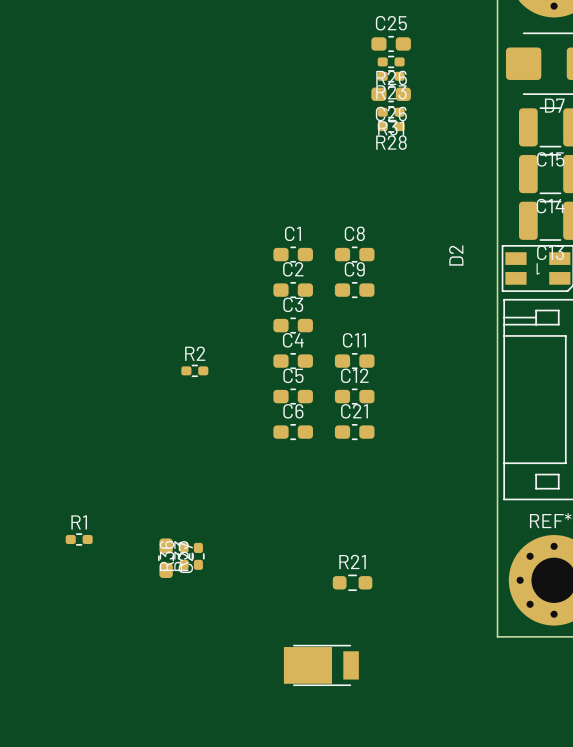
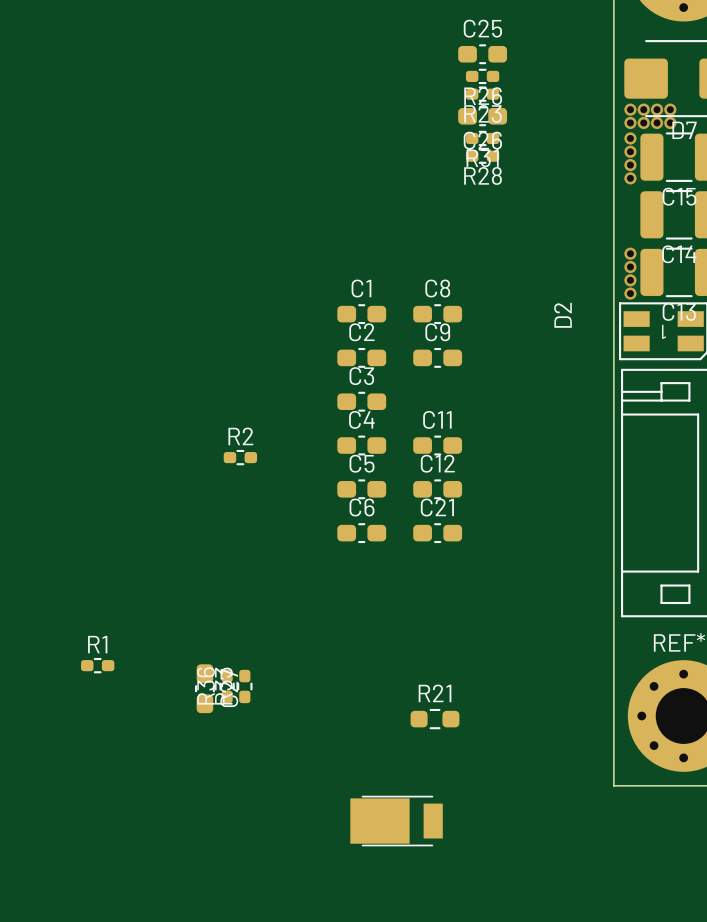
via: none -> (630, 109)
via: none -> (643, 109)
via: none -> (657, 109)
via: none -> (670, 109)
via: none -> (630, 122)
via: none -> (643, 122)
via: none -> (657, 122)
via: none -> (670, 122)
via: none -> (630, 138)
via: none -> (630, 151)
via: none -> (630, 165)
via: none -> (630, 178)
via: none -> (630, 253)
via: none -> (630, 267)
via: none -> (630, 280)
via: none -> (630, 293)

